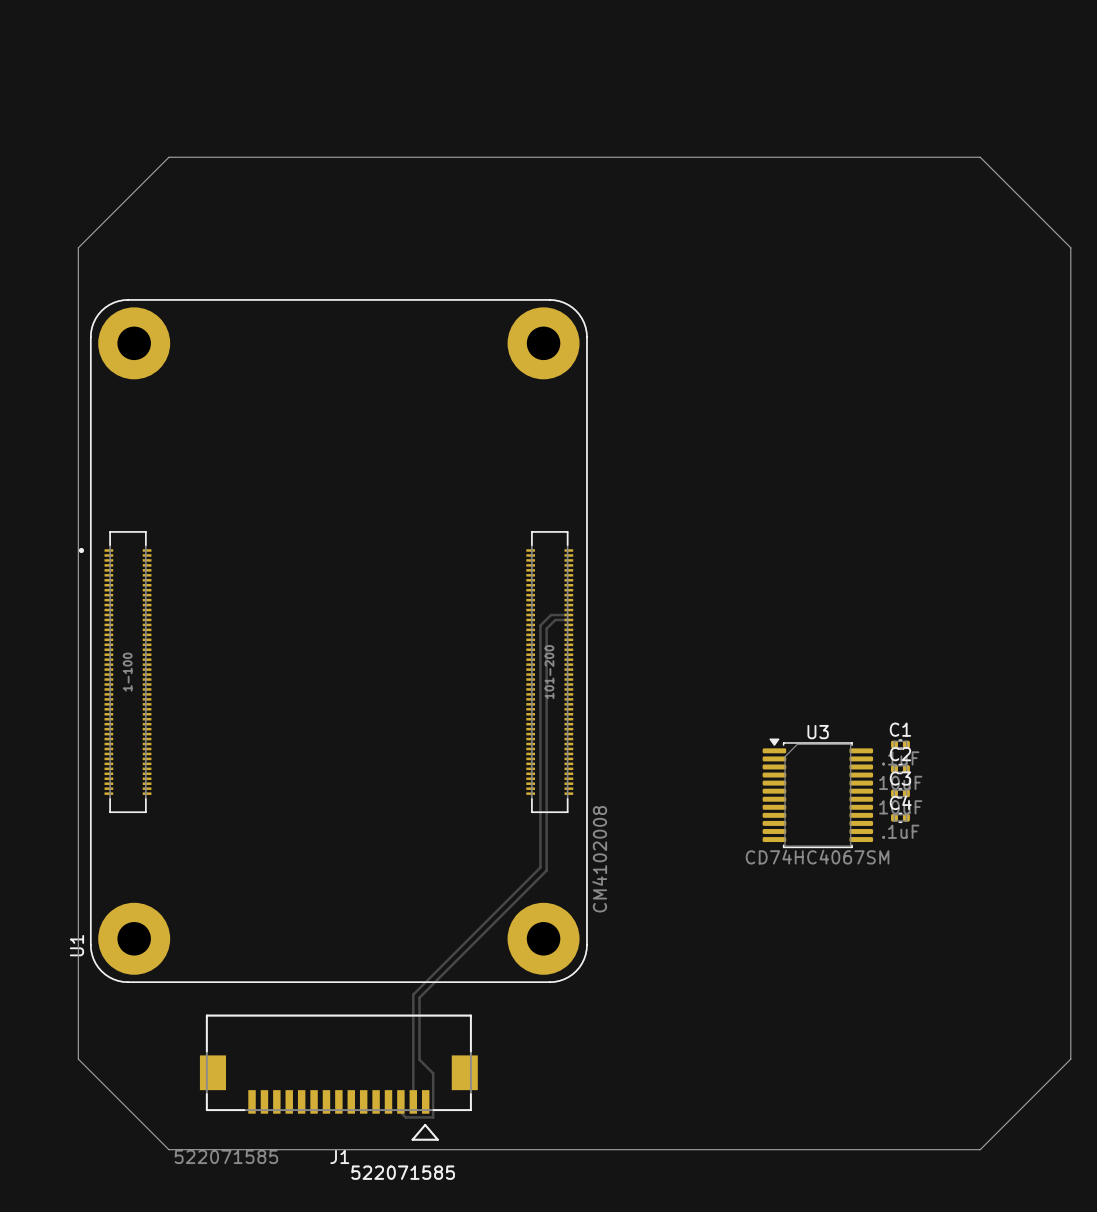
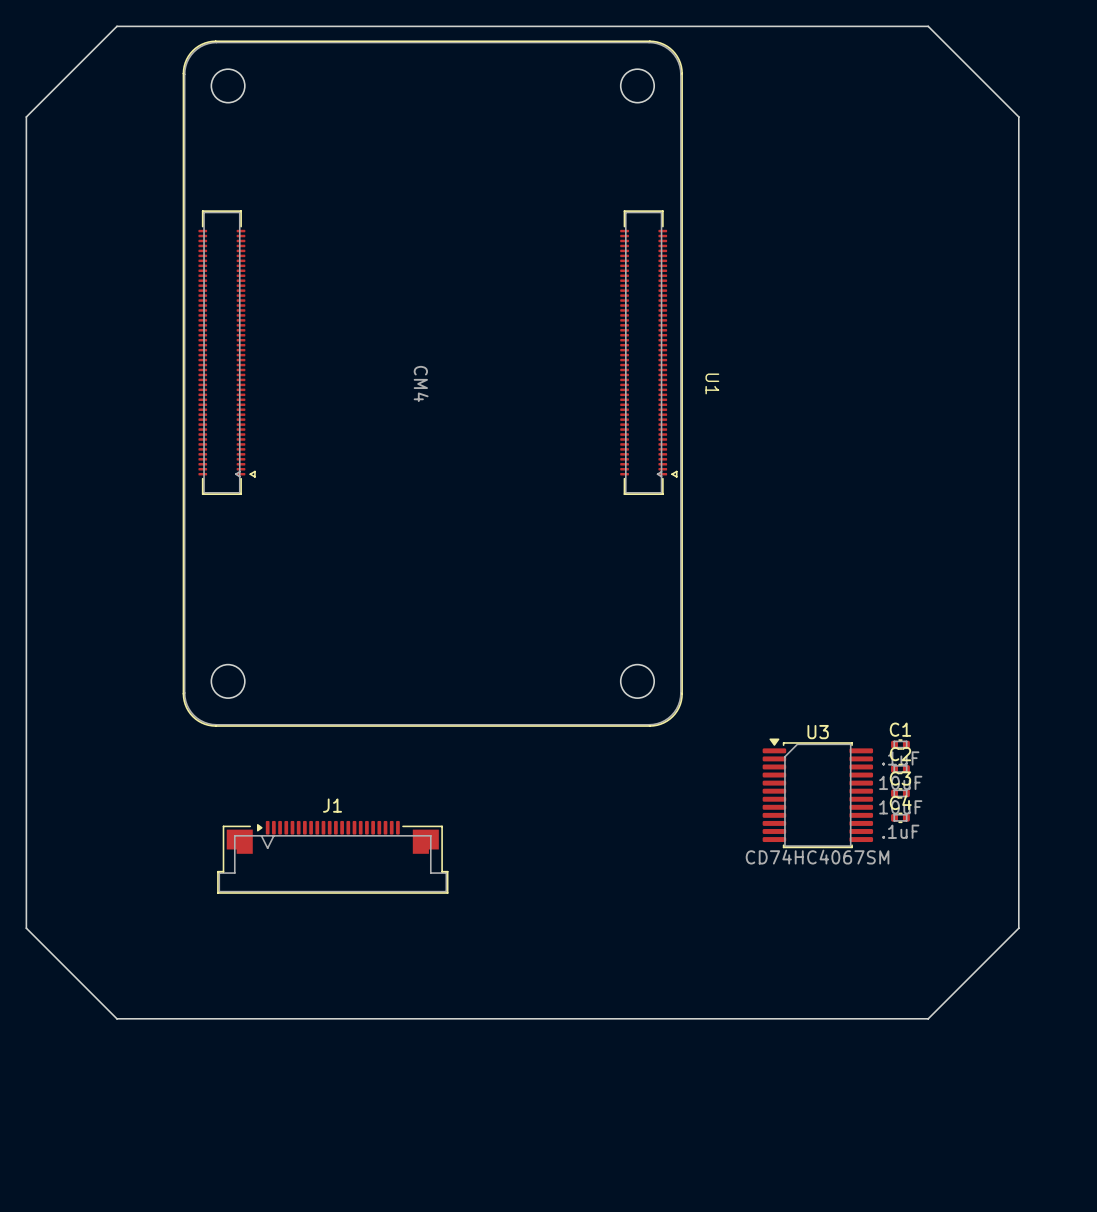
board edge: (168, 157) (78, 247) (78, 1059) (168, 1149) (980, 1149) (1070, 1059) (1070, 247) (980, 157) (168, 157) -> (116, 26) (26, 116) (26, 928) (116, 1018) (928, 1018) (1018, 928) (1018, 116) (928, 26) (116, 26)
U1 footprint: [78, 299, 588, 984] -> [182, 40, 683, 727]
track: (568, 615) (551, 615) (540, 625) (540, 867) (413, 994) (413, 1101) -> none
track: (568, 619) (555, 619) (546, 628) (546, 870) (419, 997) (419, 1059) (433, 1073) (433, 1117) (405, 1117) (400, 1112) (400, 1101) -> none
U1 value: CM4102008 (599, 859) -> CM4 (421, 383)
U1 name position: U1 (76, 945) -> U1 (712, 383)
J1 footprint: [199, 1014, 478, 1141] -> [217, 820, 449, 894]
J1 value: 522071585 (226, 1156) -> none
J1 name position: J1 (339, 1156) -> J1 (332, 805)

